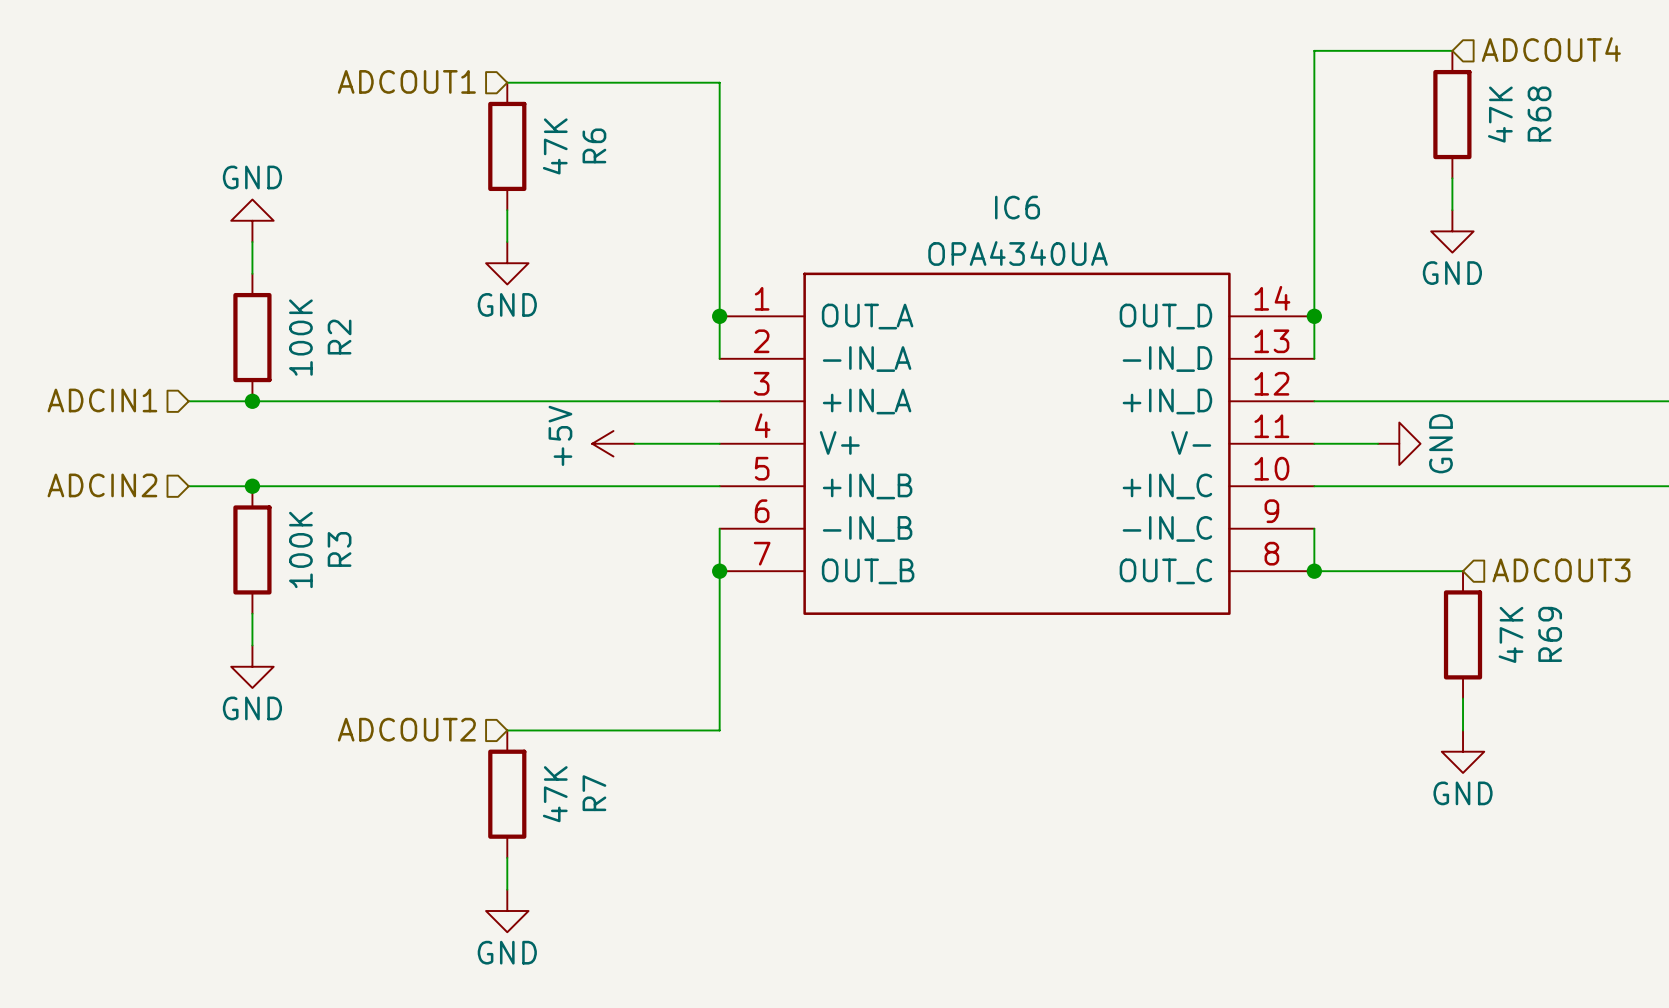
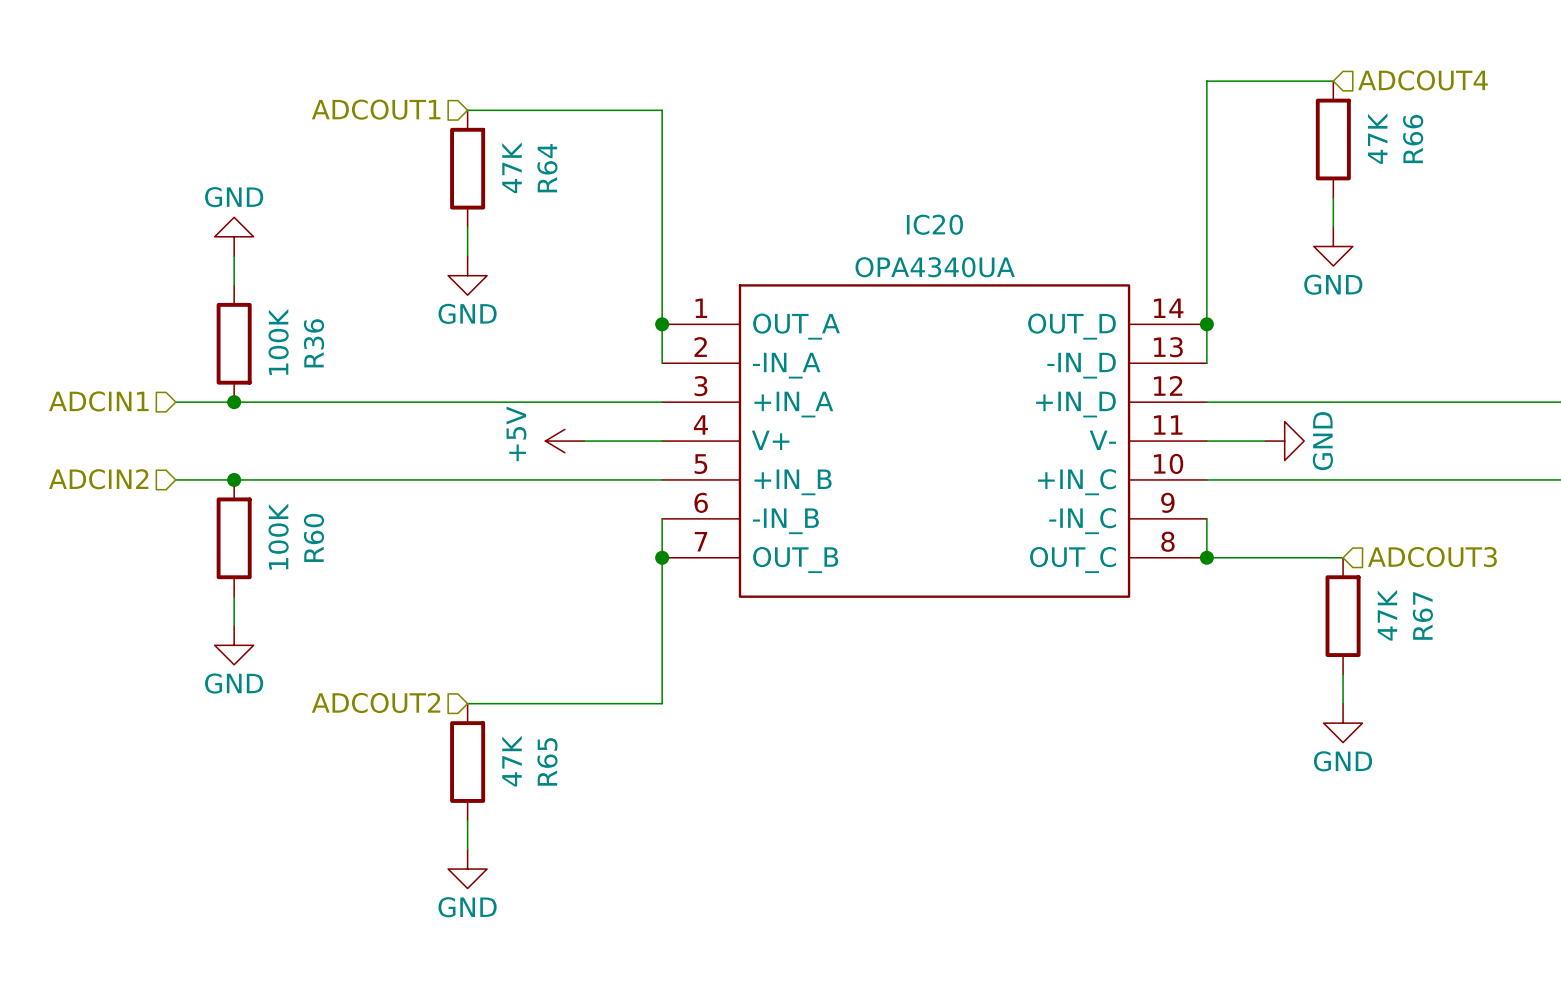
R68 name: R68 (1539, 114) -> R66 (1413, 139)
R6 name: R6 (594, 145) -> R64 (547, 168)
IC6 name: IC6 (1017, 207) -> IC20 (934, 224)
R2 name: R2 (339, 337) -> R36 (313, 343)
R3 name: R3 (339, 549) -> R60 (313, 537)
R69 name: R69 (1550, 634) -> R67 (1422, 615)
R7 name: R7 (594, 793) -> R65 (547, 761)

